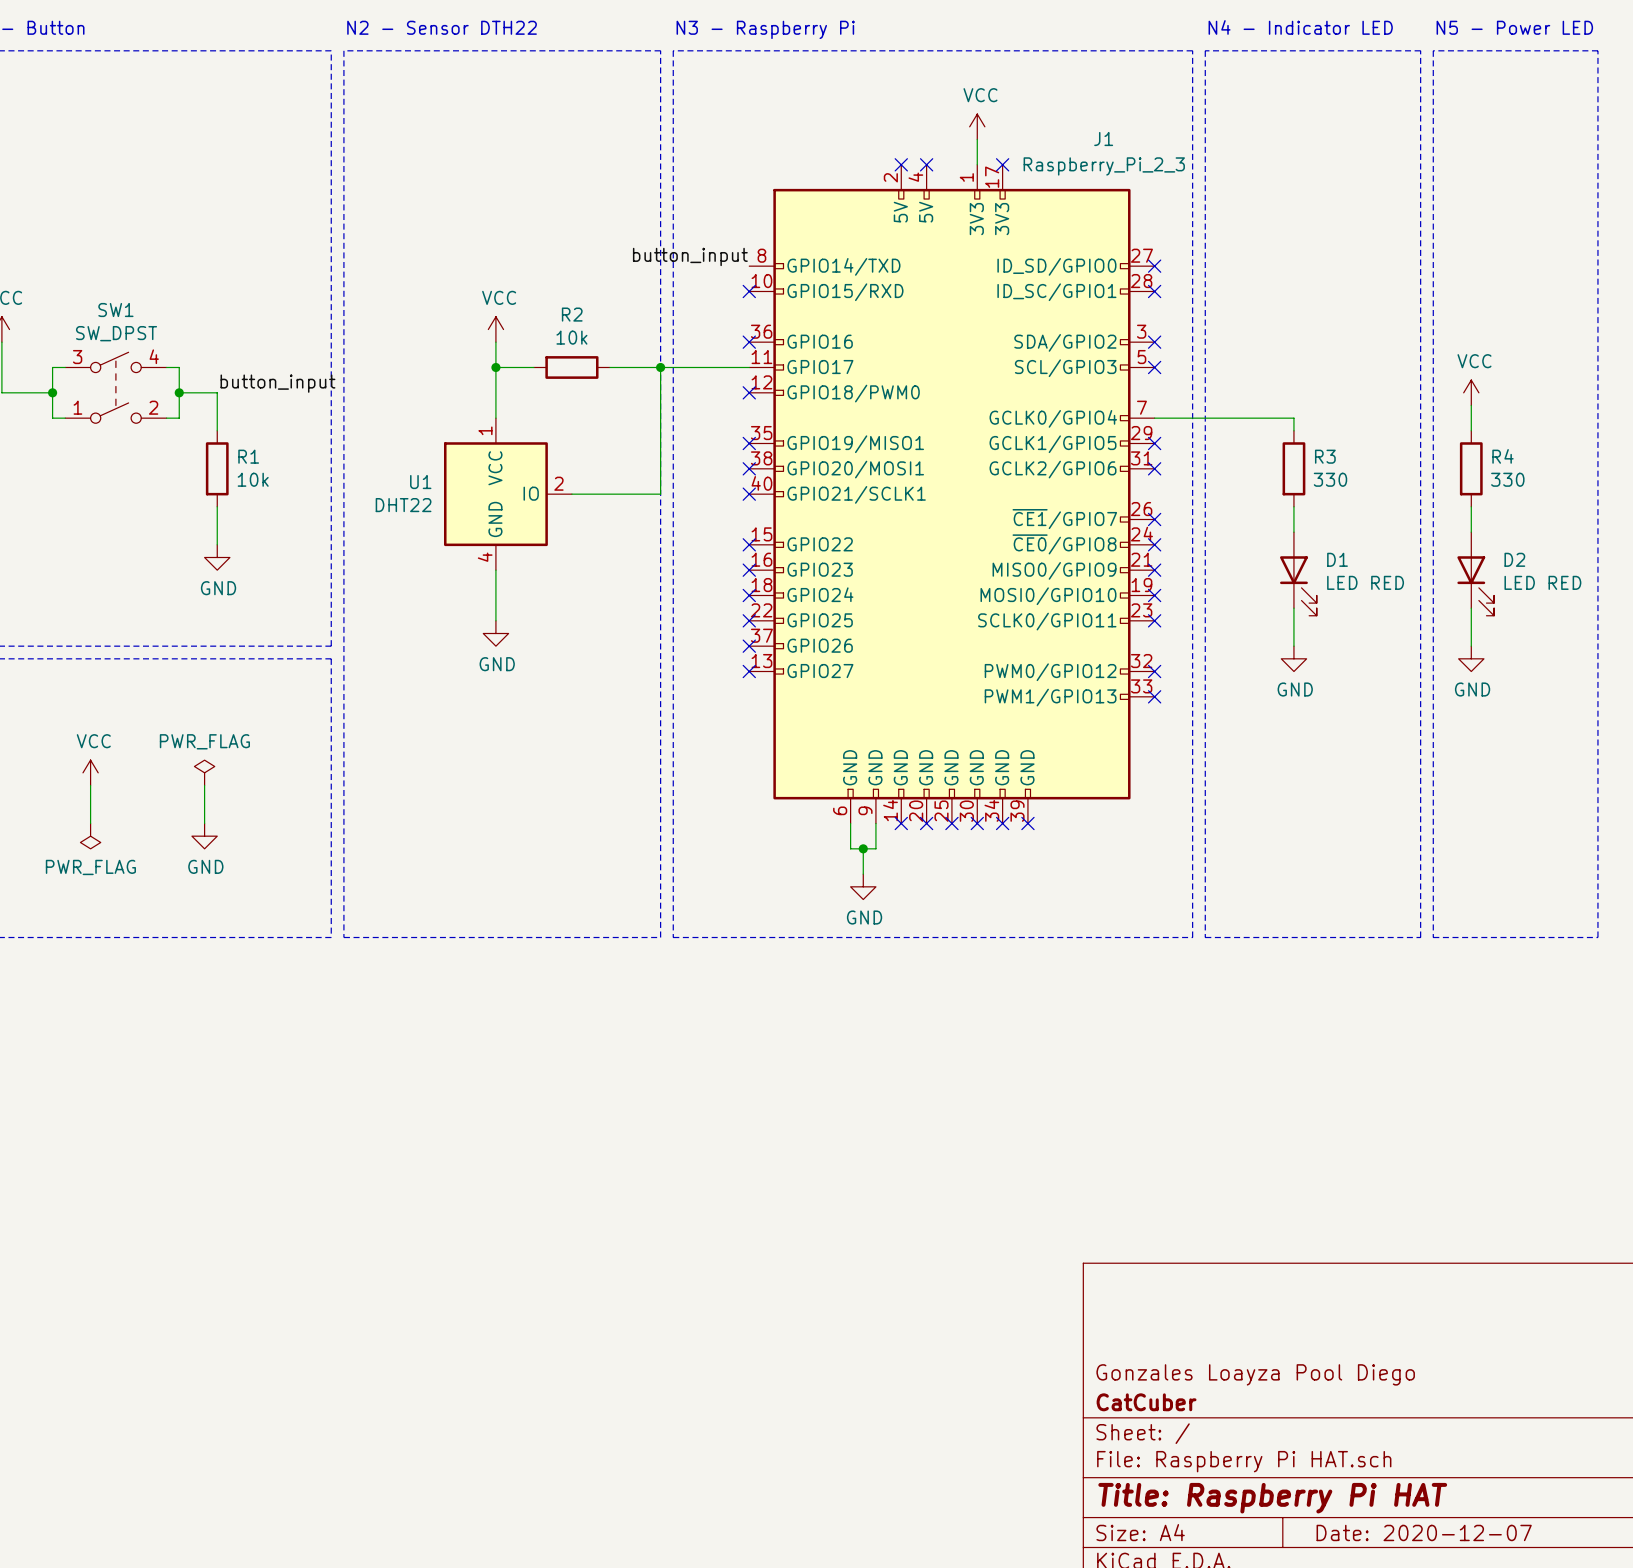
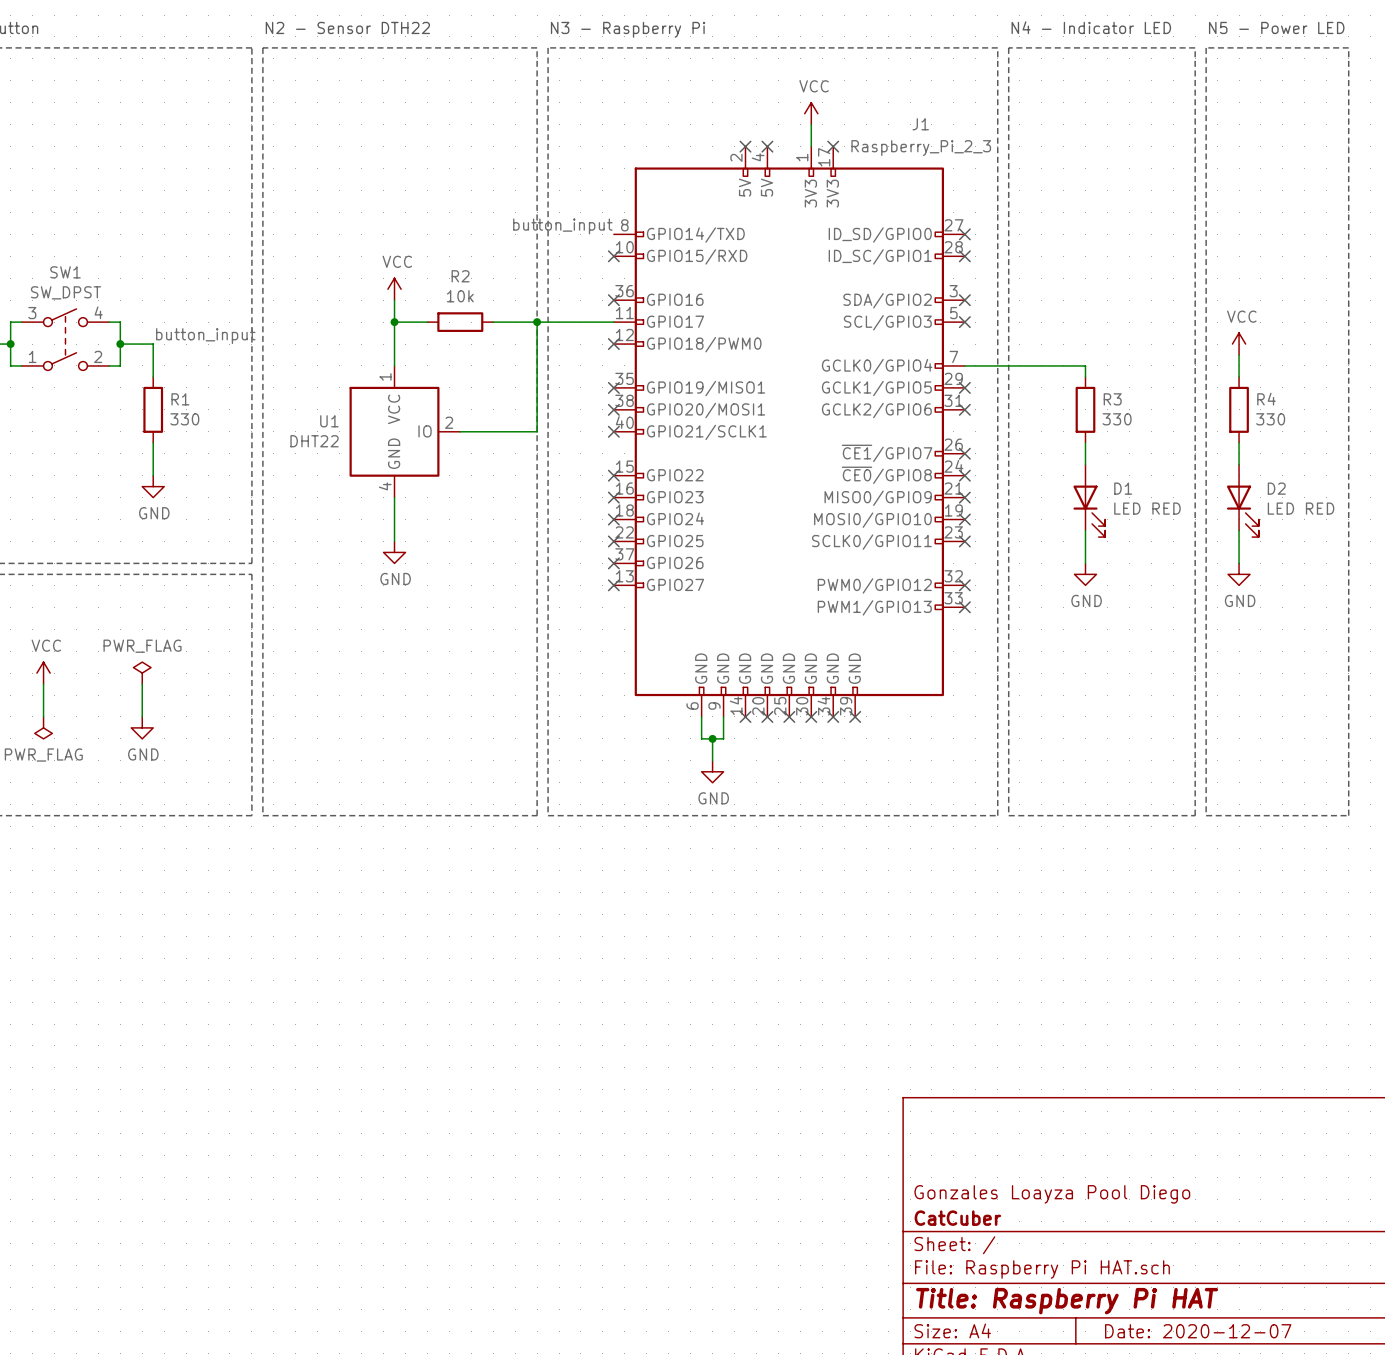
R1 value: 10k (253, 479) -> 330 (184, 419)

